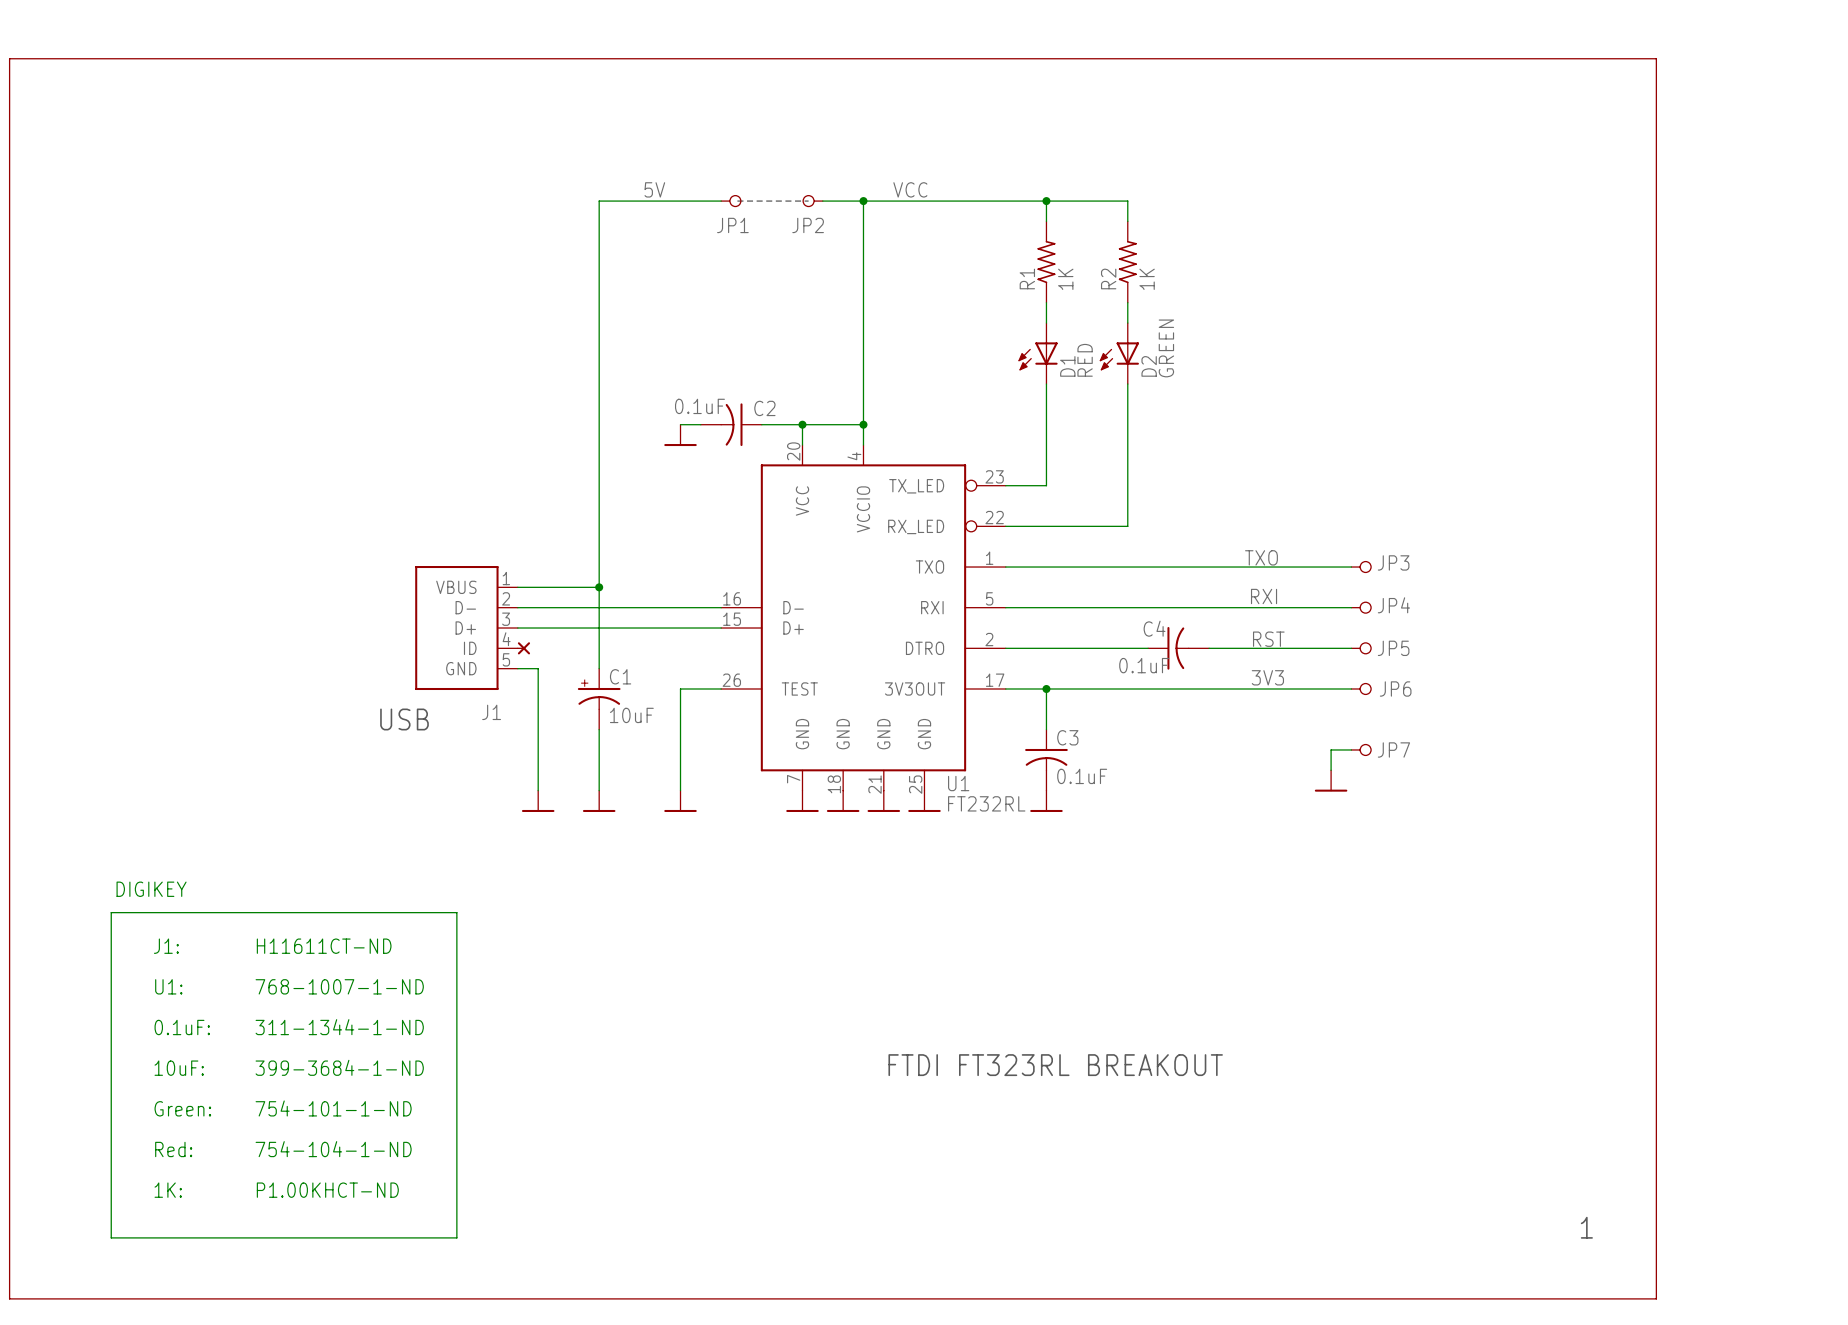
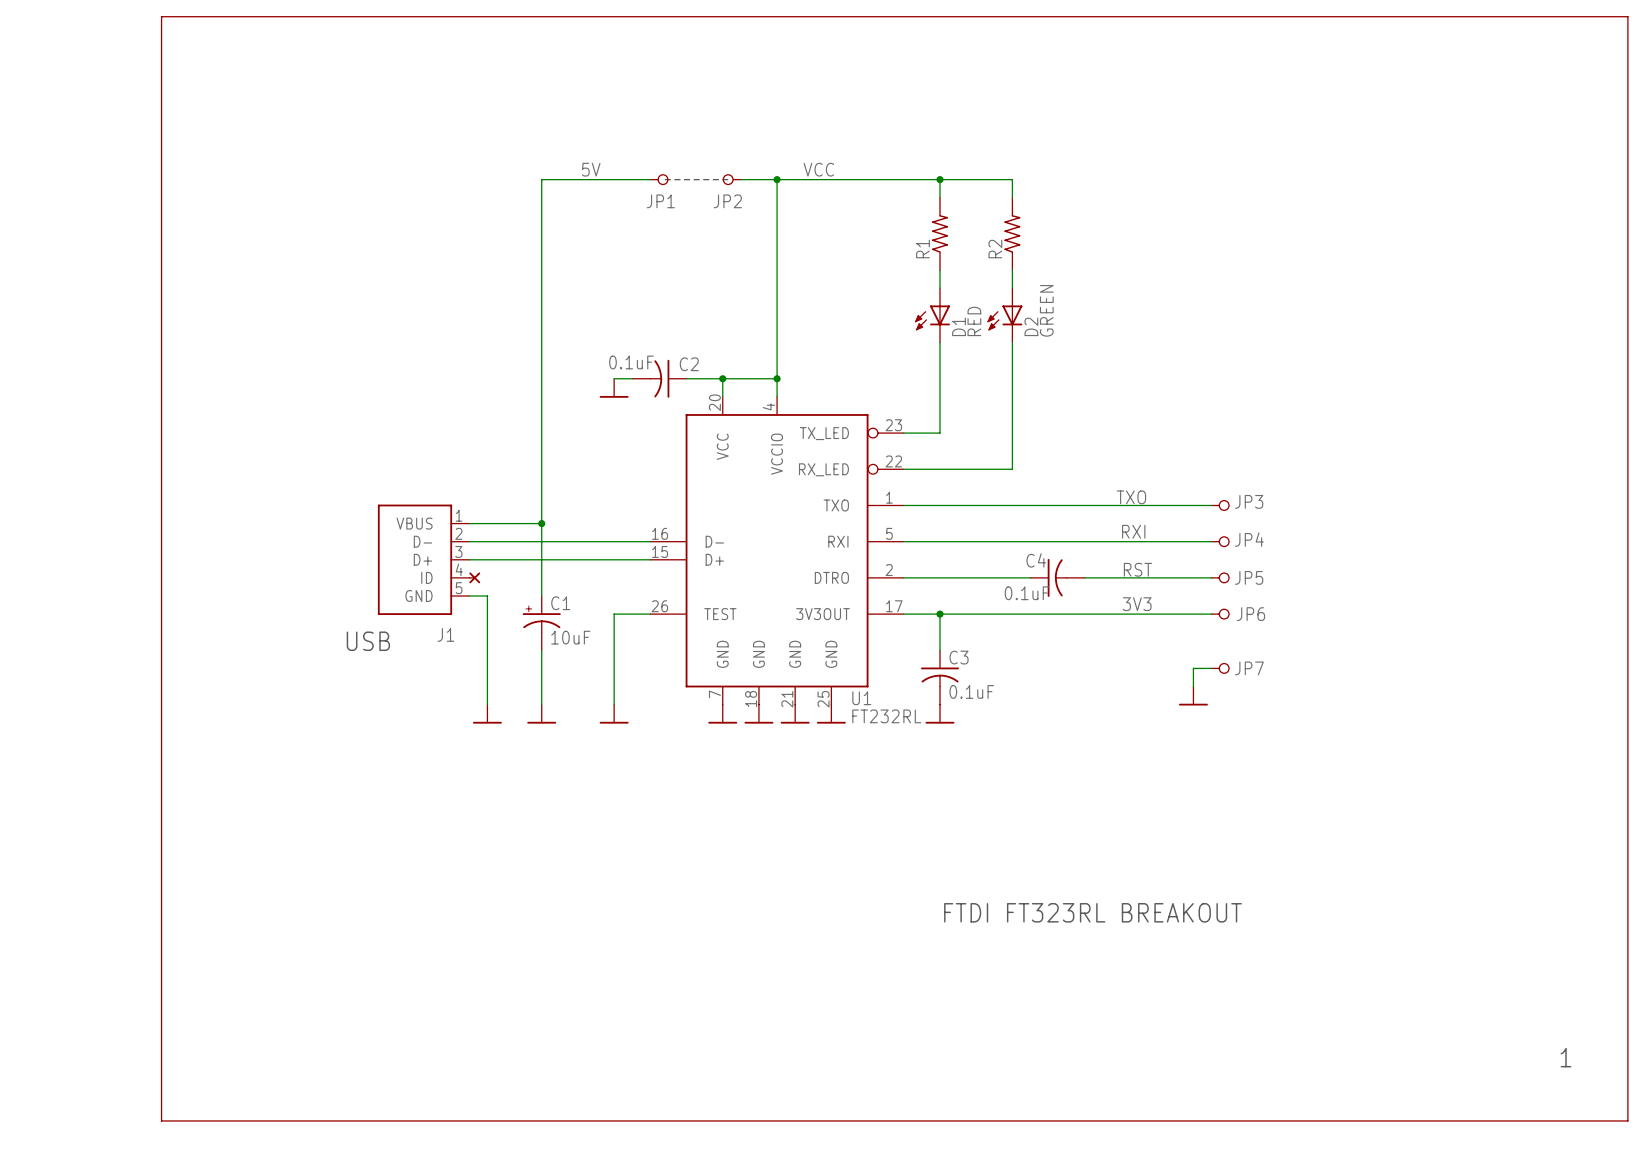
line: (9, 58) (1656, 58) (1656, 1298) (9, 1298) (9, 58) -> (161, 16) (1627, 16) (1627, 1120) (161, 1120) (161, 16)
R1 value: 1K (1065, 279) -> none
R2 value: 1K (1147, 279) -> none
text: DIGIKEY (151, 889) -> none
wire: (111, 912) (456, 912) (456, 1237) (111, 1237) (111, 912) -> none
text: J1: (166, 946) -> none
text: H11611CT-ND (324, 946) -> none
text: U1: (168, 986) -> none
text: 768-1007-1-ND (339, 986) -> none
text: 0.1uF: (182, 1027) -> none
text: 311-1344-1-ND (339, 1027) -> none
text position: FTDI FT323RL BREAKOUT (1055, 1065) -> FTDI FT323RL BREAKOUT (1093, 912)
text: 399-3684-1-ND (339, 1067) -> none
text: 10uF: (179, 1068) -> none
text: Green: (182, 1108) -> none
text: 754-101-1-ND (333, 1108) -> none
text: Red: (173, 1149) -> none
text: 754-104-1-ND (333, 1149) -> none
text: 1K: (168, 1190) -> none
text: P1.00KHCT-ND (327, 1190) -> none
text position: 1 (1586, 1227) -> 1 (1566, 1057)

